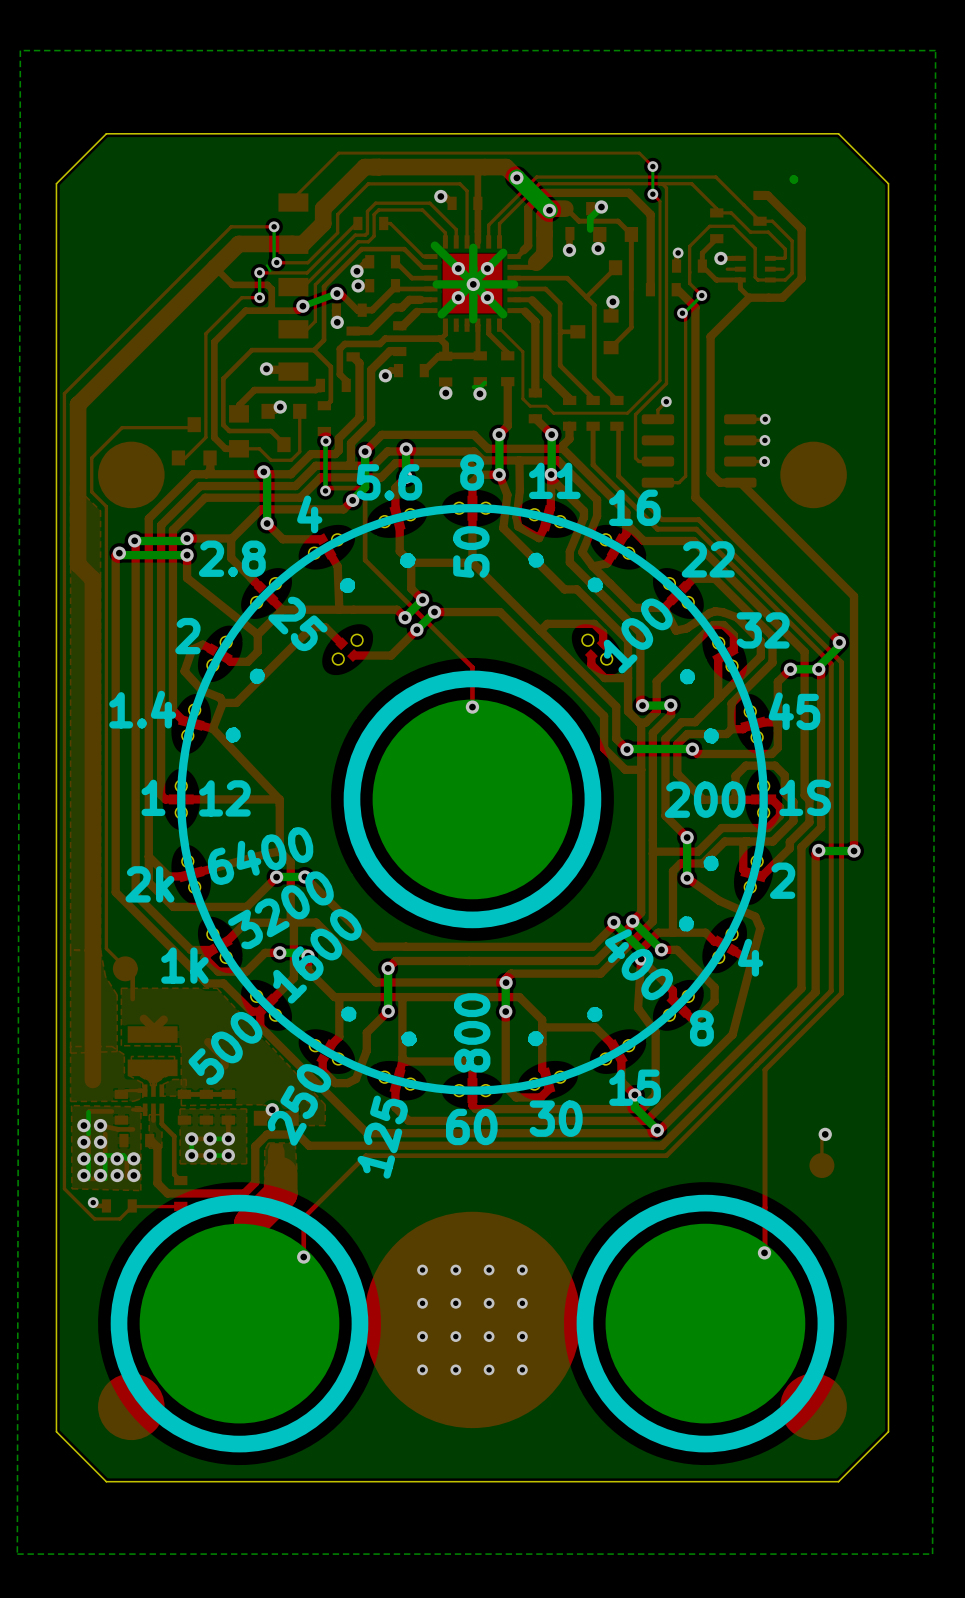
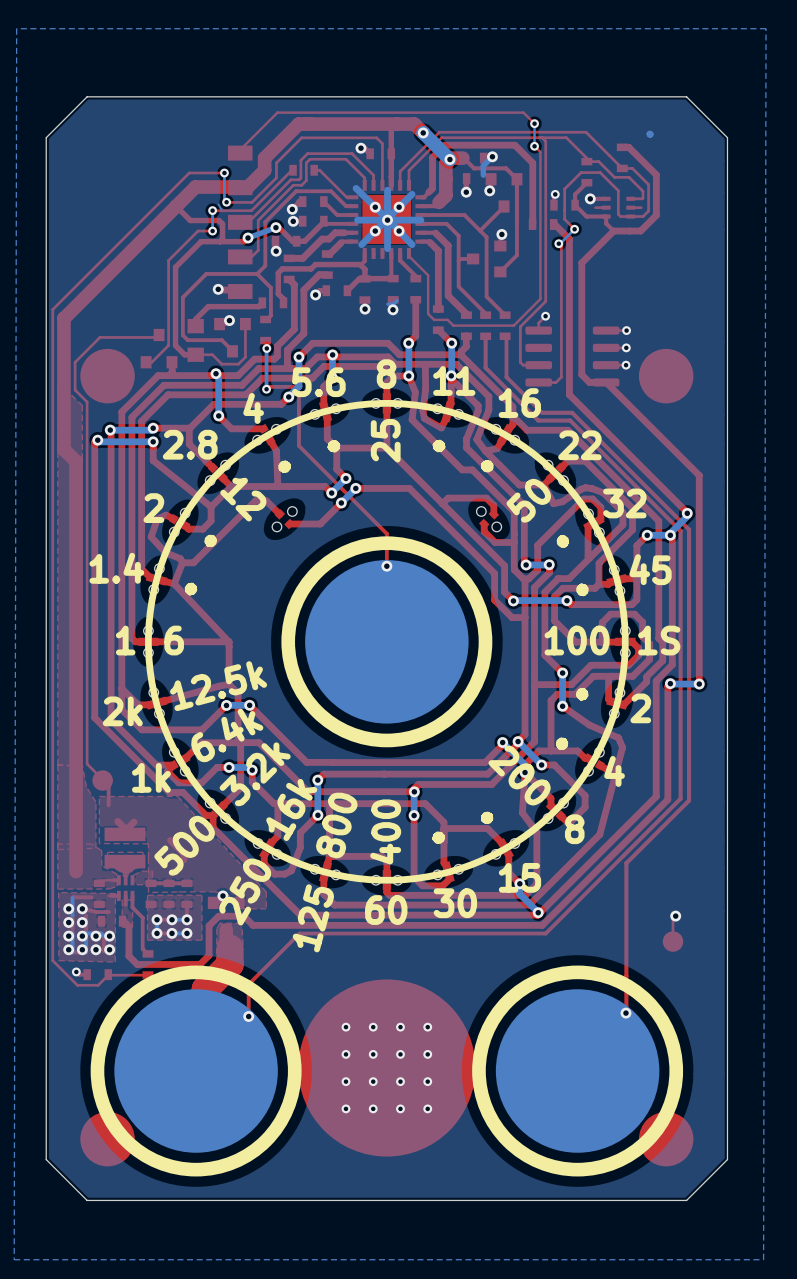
text: 50 (471, 551) -> 25 (385, 440)
text: 25 (297, 623) -> none
text: none -> 50 (528, 500)
text rotation: 0° (638, 635) -> 45° clockwise (577, 640)
text position: 100 (638, 635) -> 100 (577, 640)
text: none -> 6 (174, 640)
text rotation: 0° (224, 798) -> 45° clockwise (243, 499)
text position: 12 (224, 798) -> 12 (243, 499)
text: 200 (705, 799) -> none
text: 6400 (260, 856) -> 12.5k (218, 686)
text: 3200 (280, 910) -> 6.4k (227, 735)
text: 1600 (317, 956) -> 3.2k (255, 774)
text: 400 (639, 964) -> 200 (519, 775)
text: • (348, 1014) -> 16k (291, 810)
text: 800 (472, 1032) -> 400 (385, 831)
text: • (409, 1038) -> 800 (336, 825)

